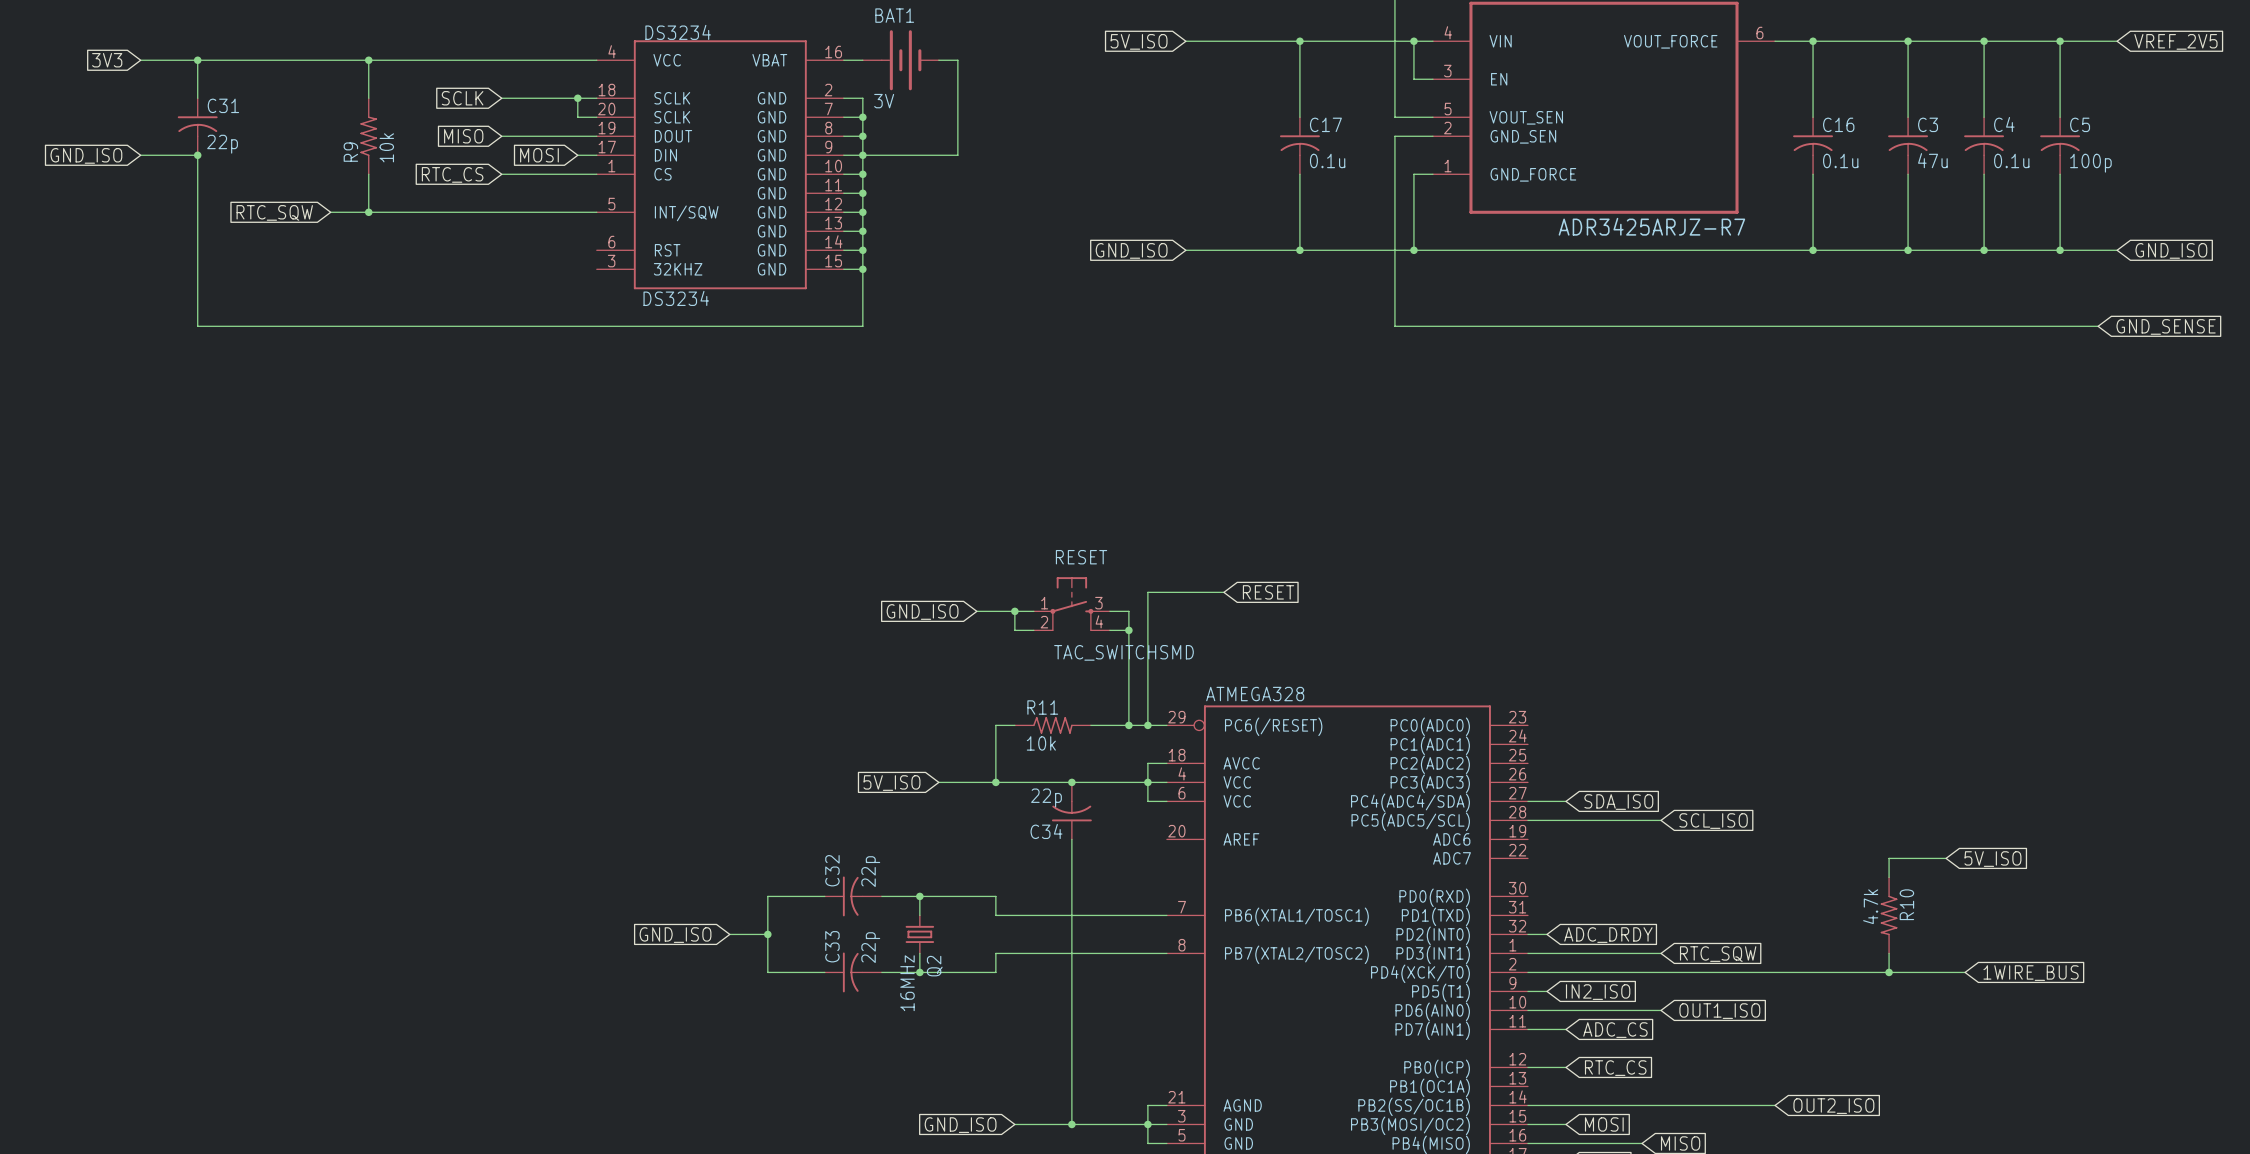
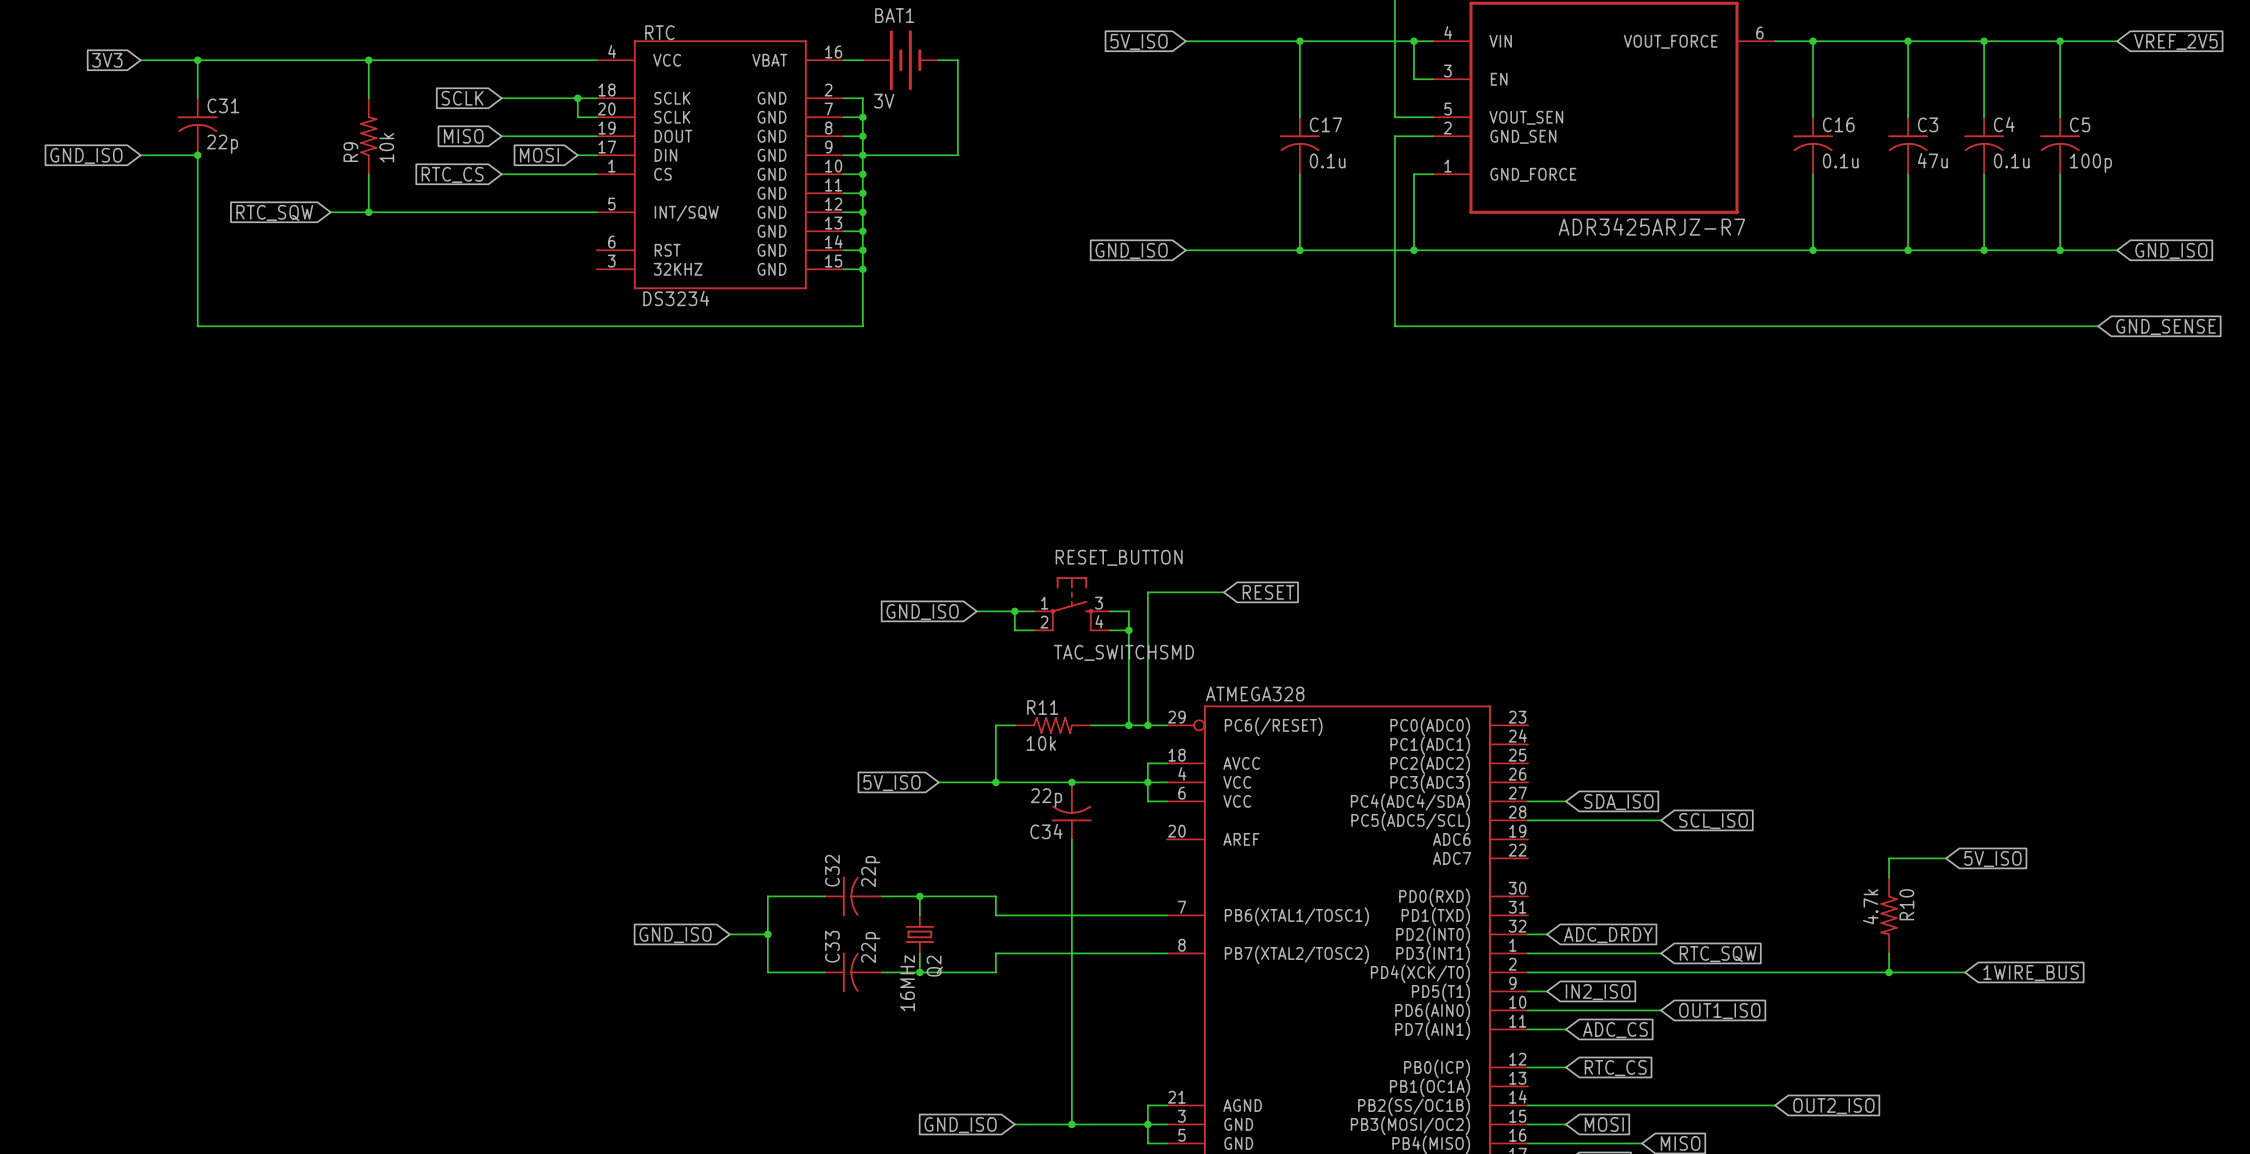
DS3234 name: DS3234 (678, 32) -> RTC (659, 32)
RESET name: RESET (1081, 557) -> RESET_BUTTON (1119, 557)

